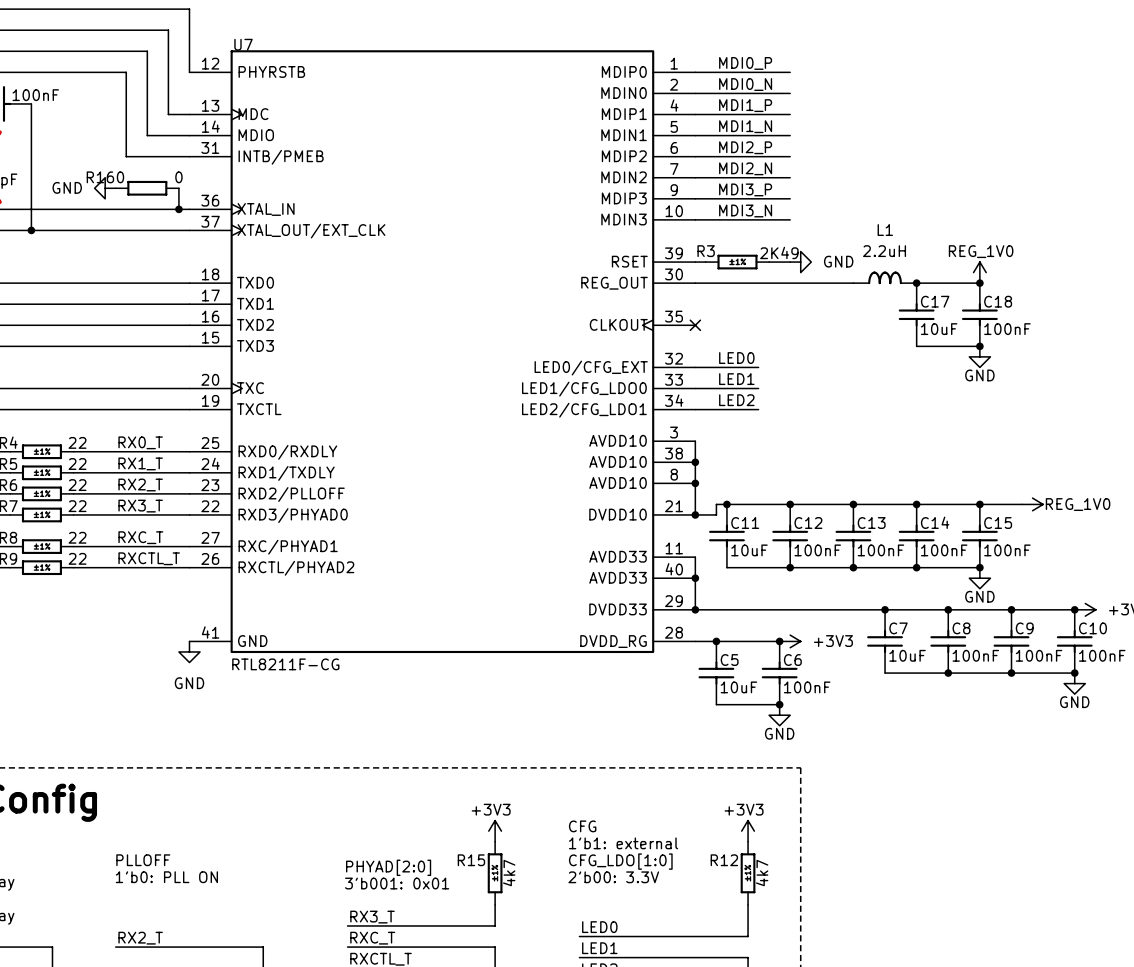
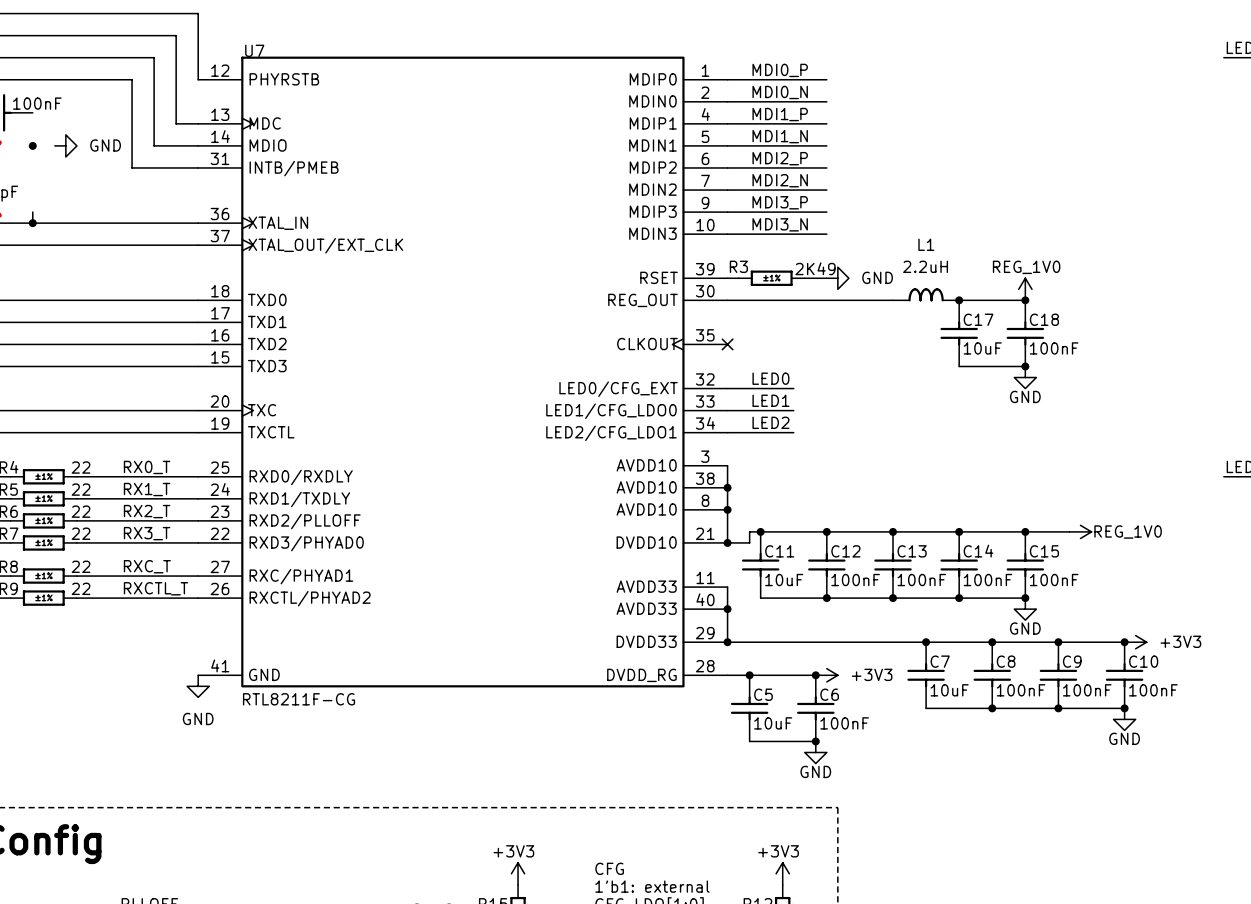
wire: (31, 103) (31, 198) -> none
junction: none -> (32, 145)
power symbol rotation: 0° (105, 188) -> 180° (65, 145)
power symbol position: GND (105, 188) -> GND (65, 145)
R160: (147, 188) -> none
wire: (178, 188) (178, 209) -> none
wire: (31, 209) (31, 230) -> none
junction: (178, 209) -> none
junction position: (31, 230) -> (32, 223)

